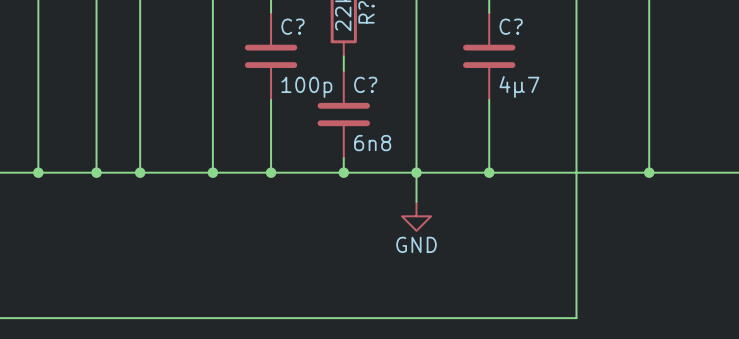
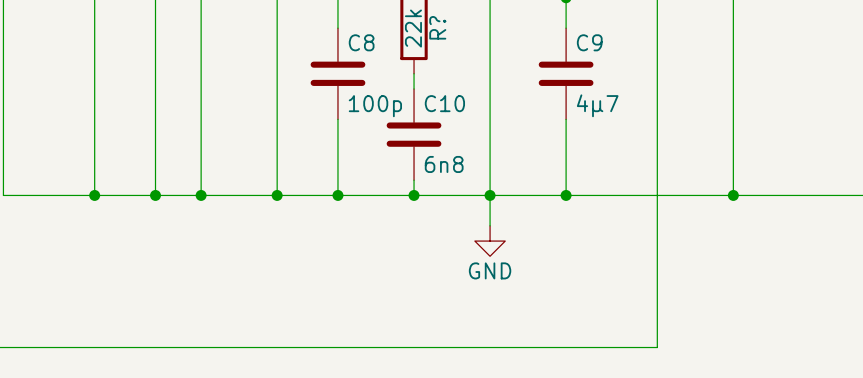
C? name: C? (292, 26) -> C8 (361, 42)
C? name: C? (511, 26) -> C9 (589, 42)
C? name: C? (365, 84) -> C10 (444, 103)

